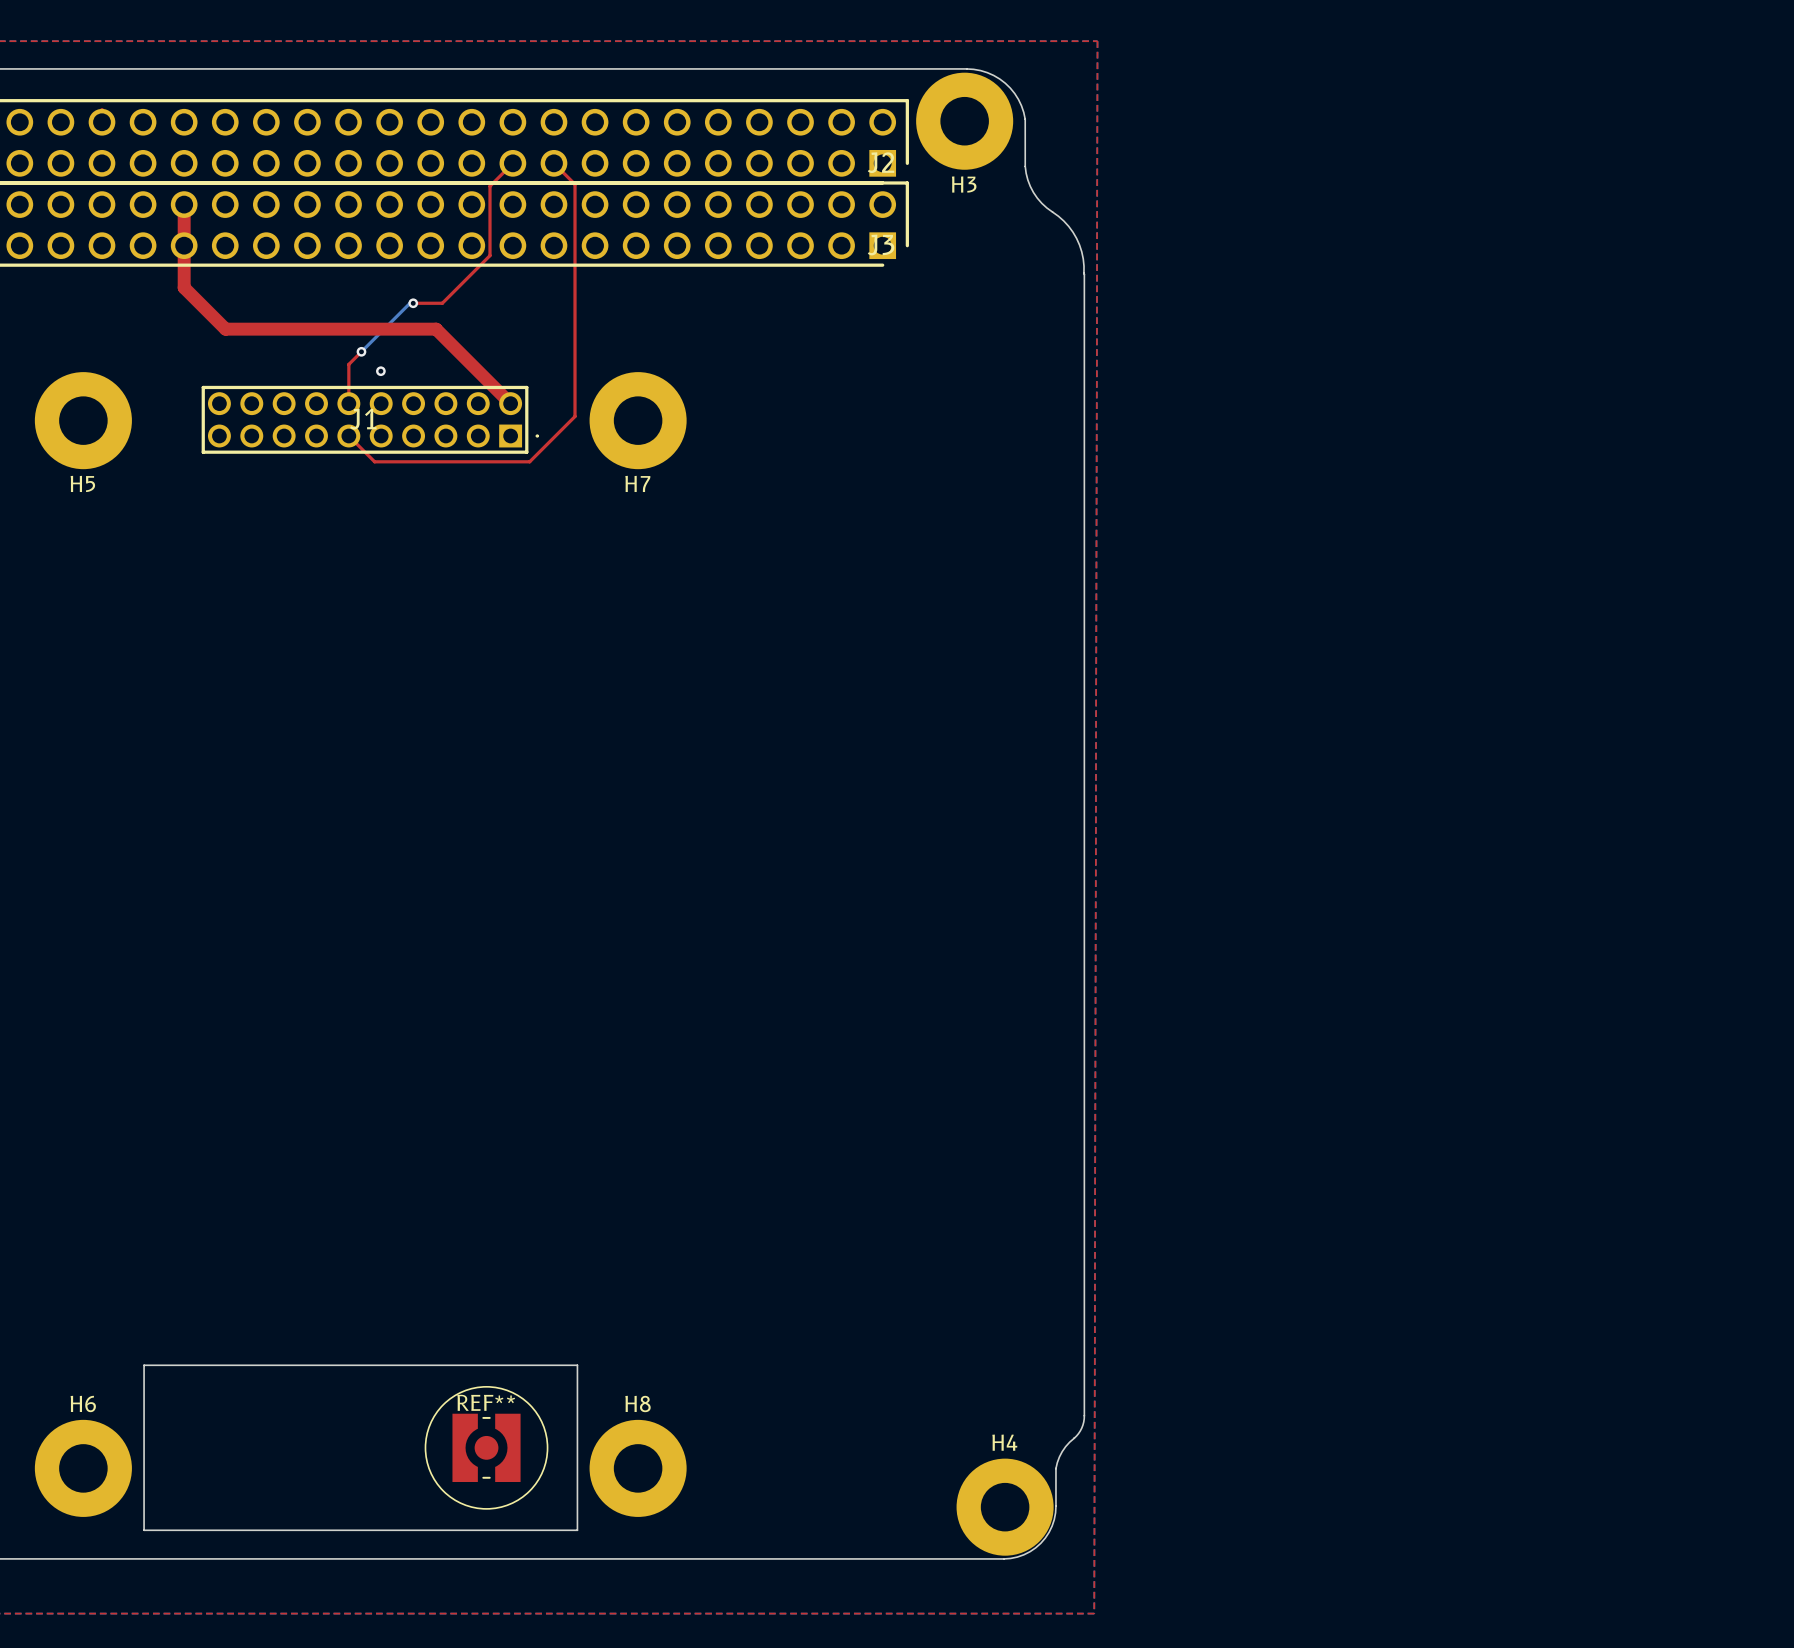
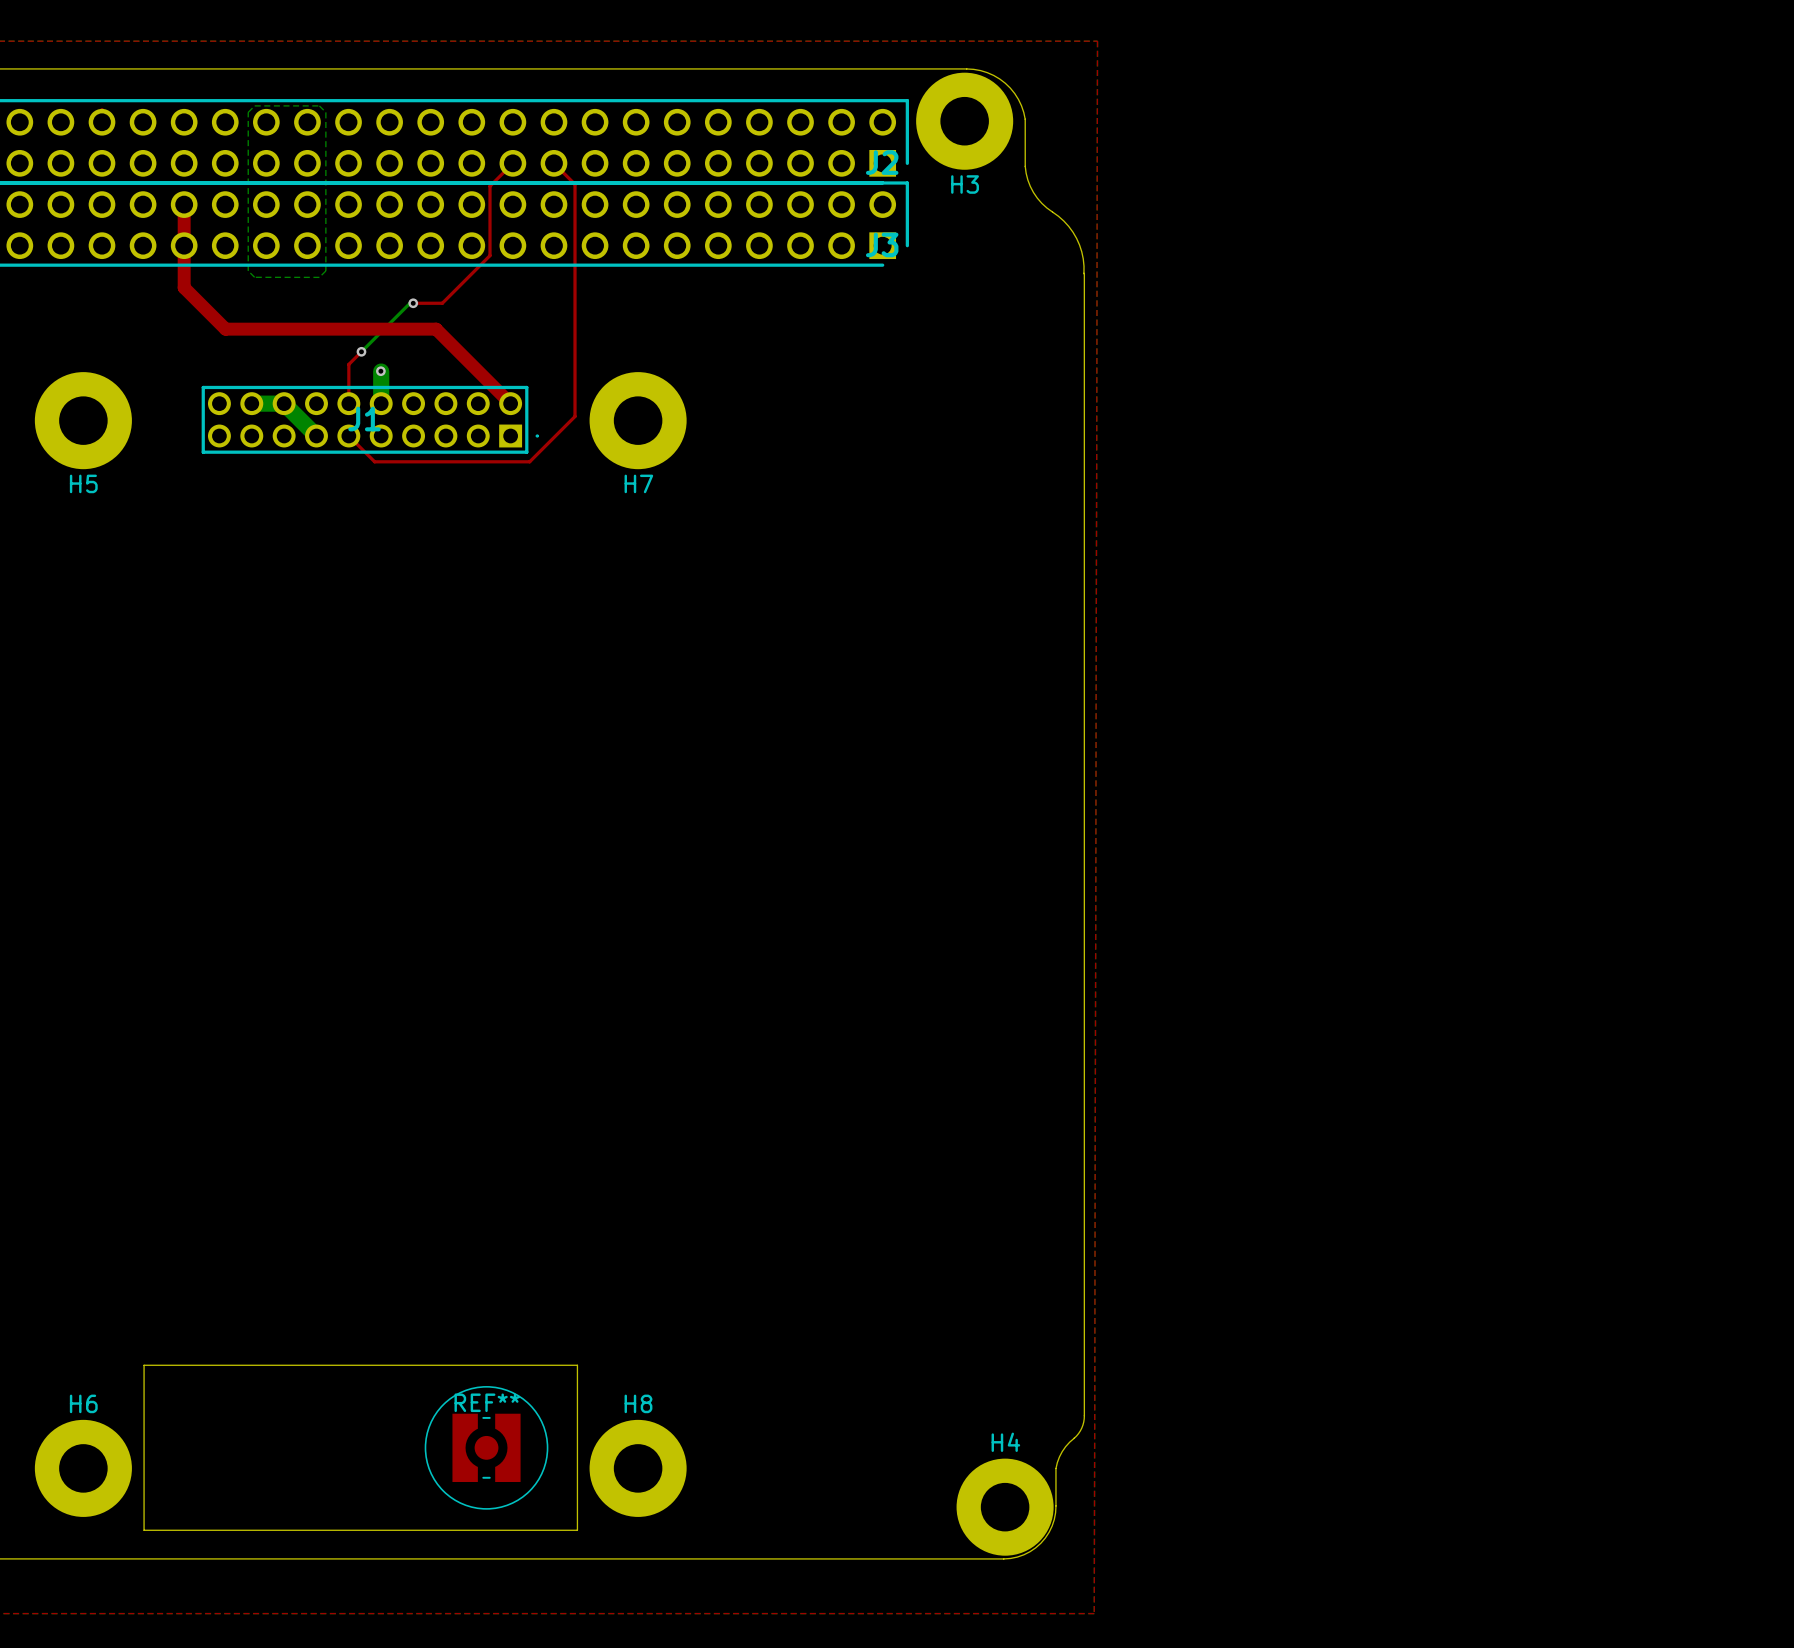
bottom zone outline: none -> (254, 105) (248, 112) (248, 270) (254, 277) (319, 277) (325, 270) (325, 112) (319, 105) (254, 105)
bottom track: none -> (381, 371) (381, 403)
bottom track: none -> (251, 403) (284, 403) (316, 436)

